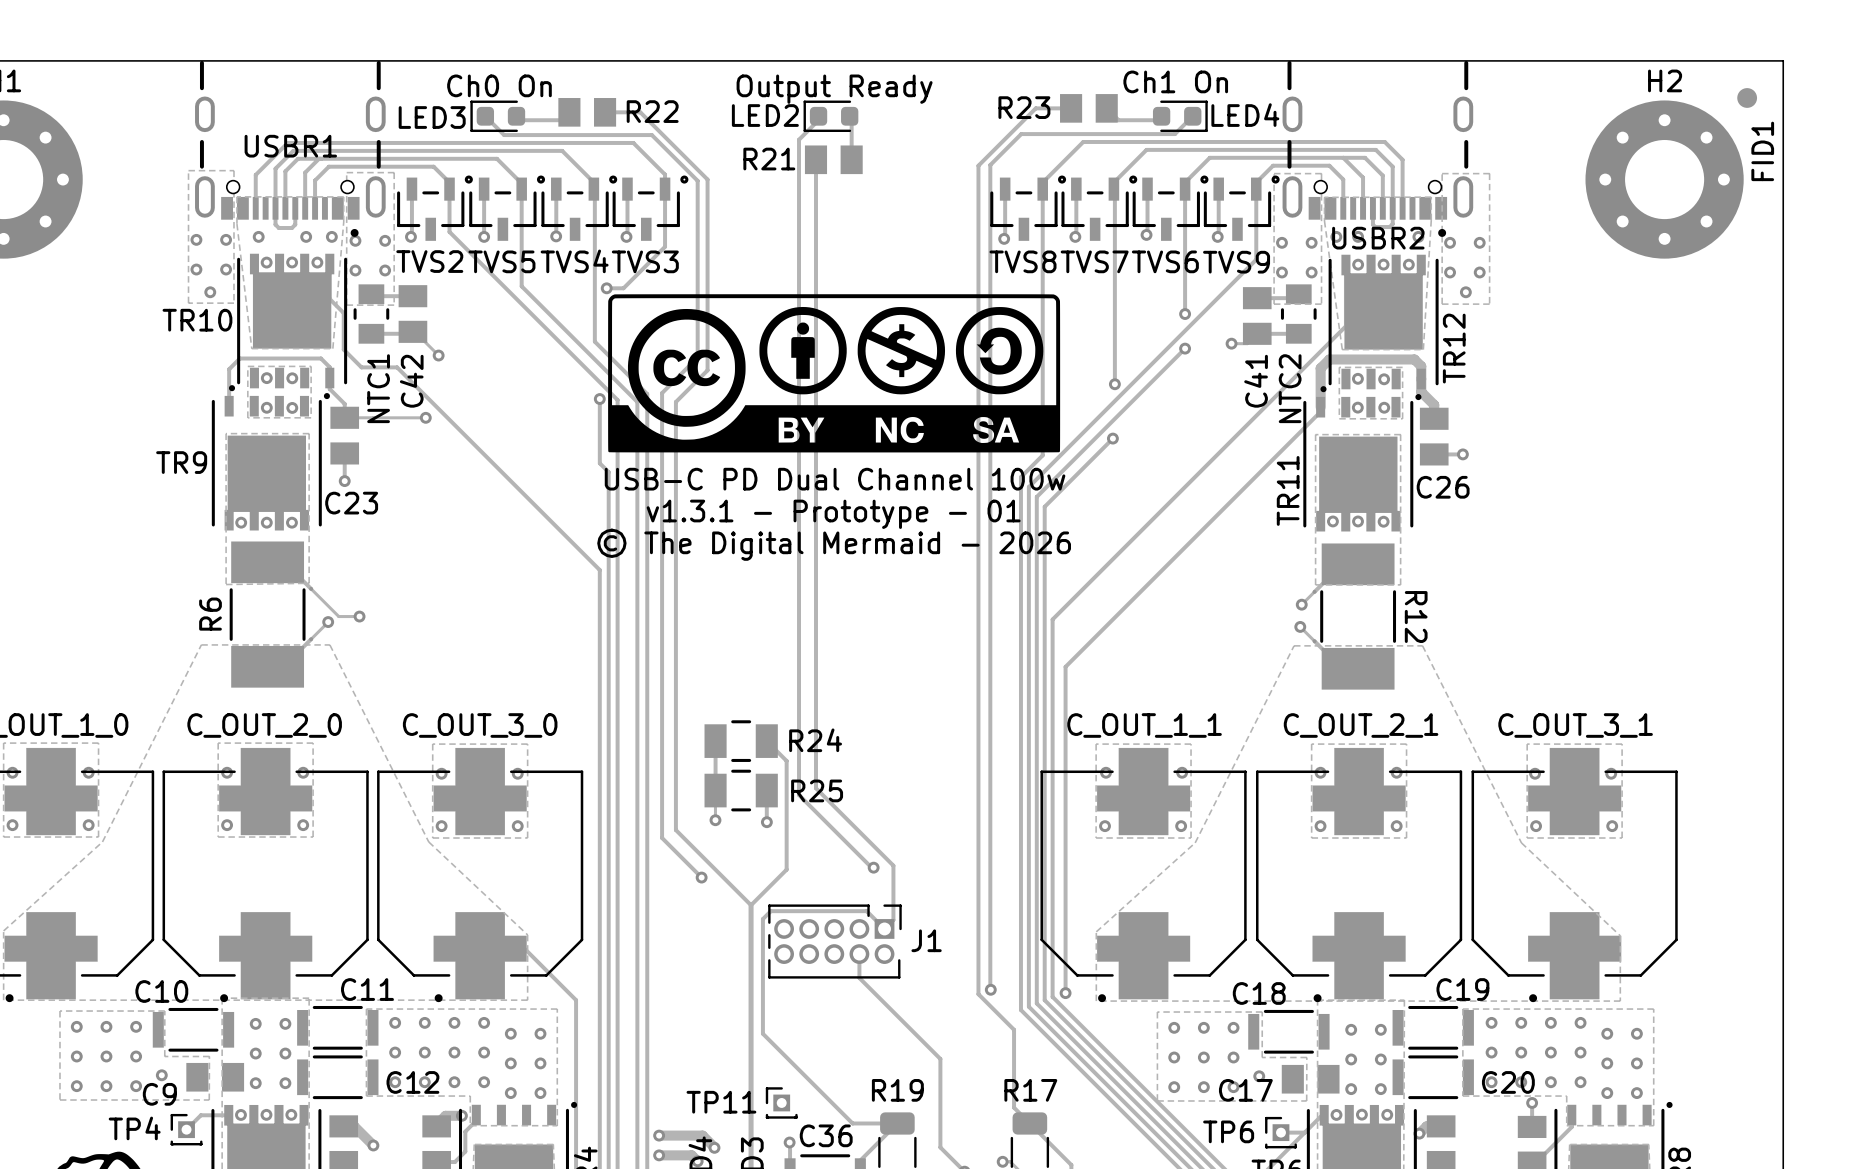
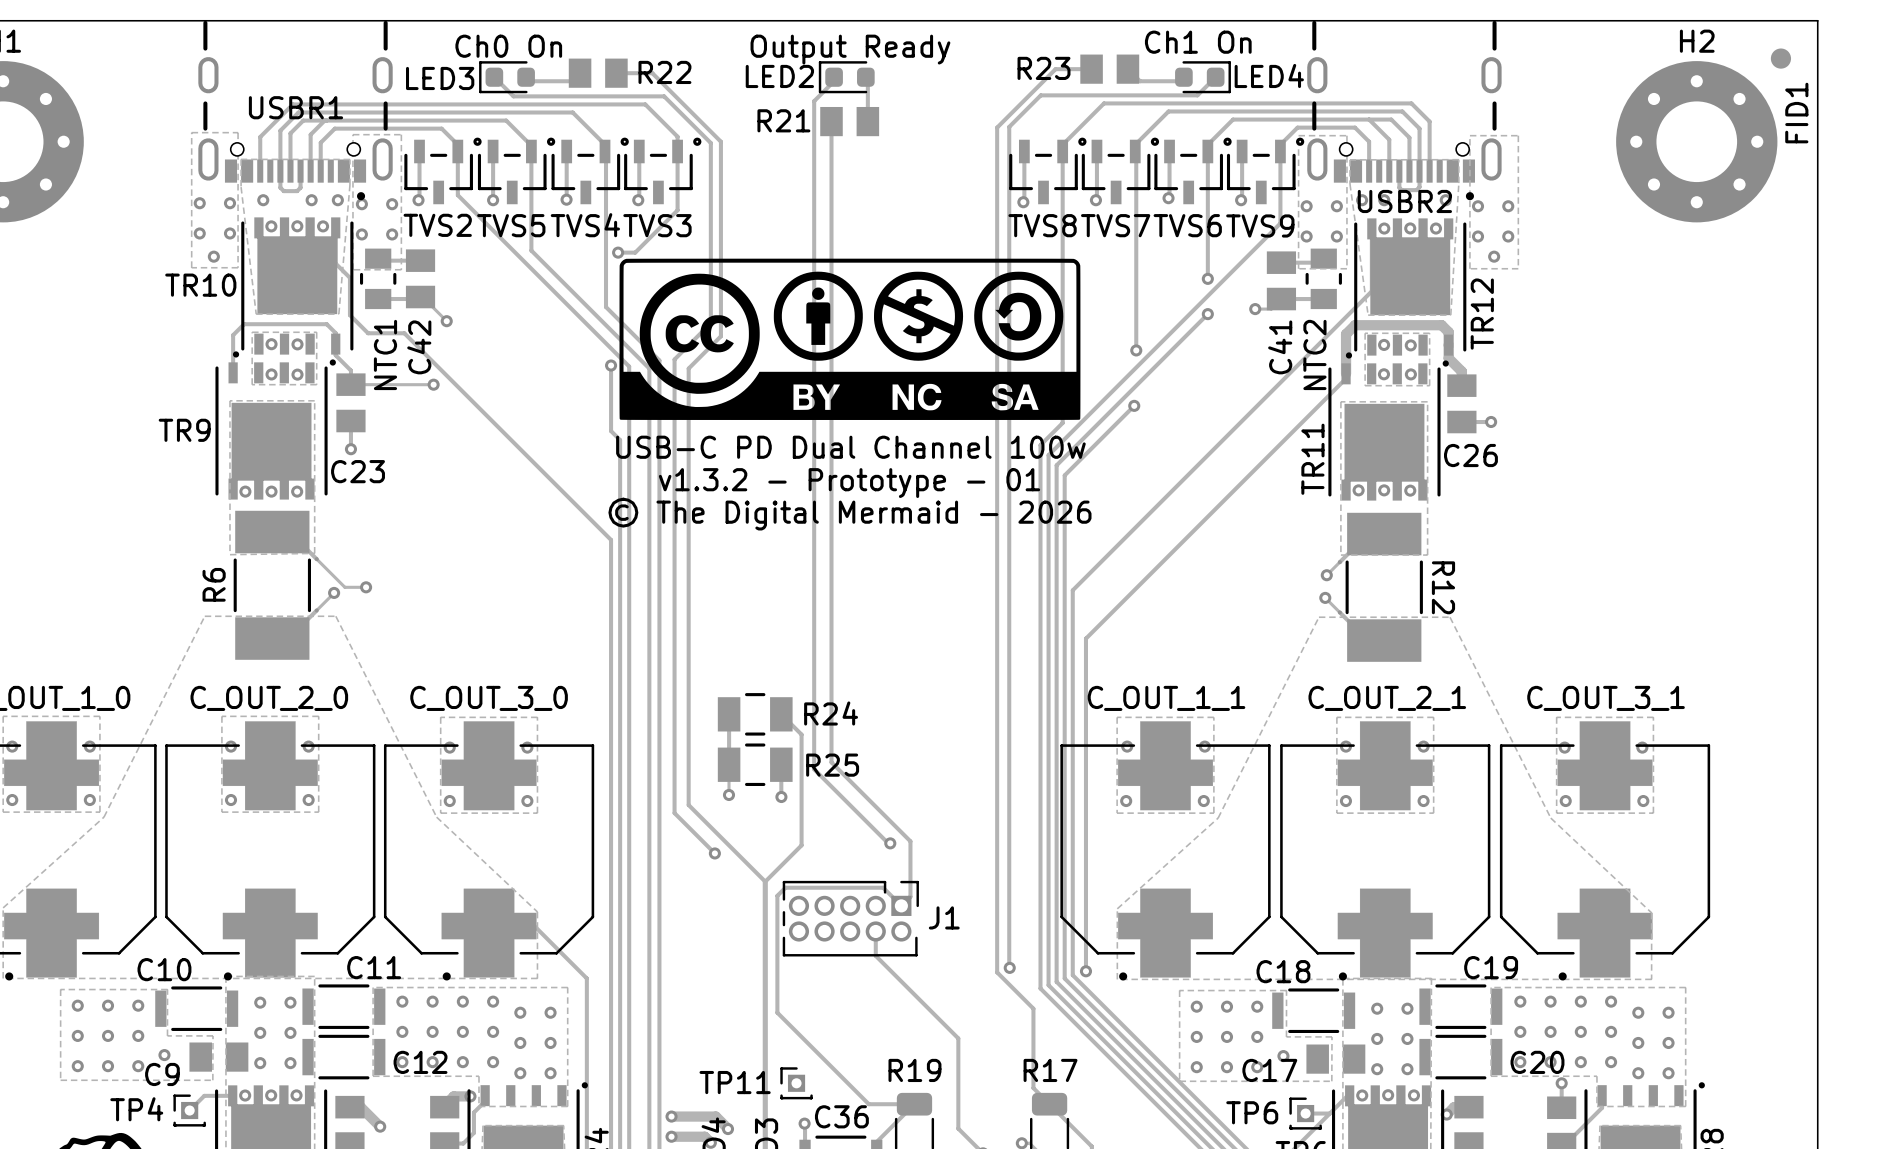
text: v1.3.1 - Prototype - 01 (833, 514) -> v1.3.2 - Prototype - 01 (849, 483)

